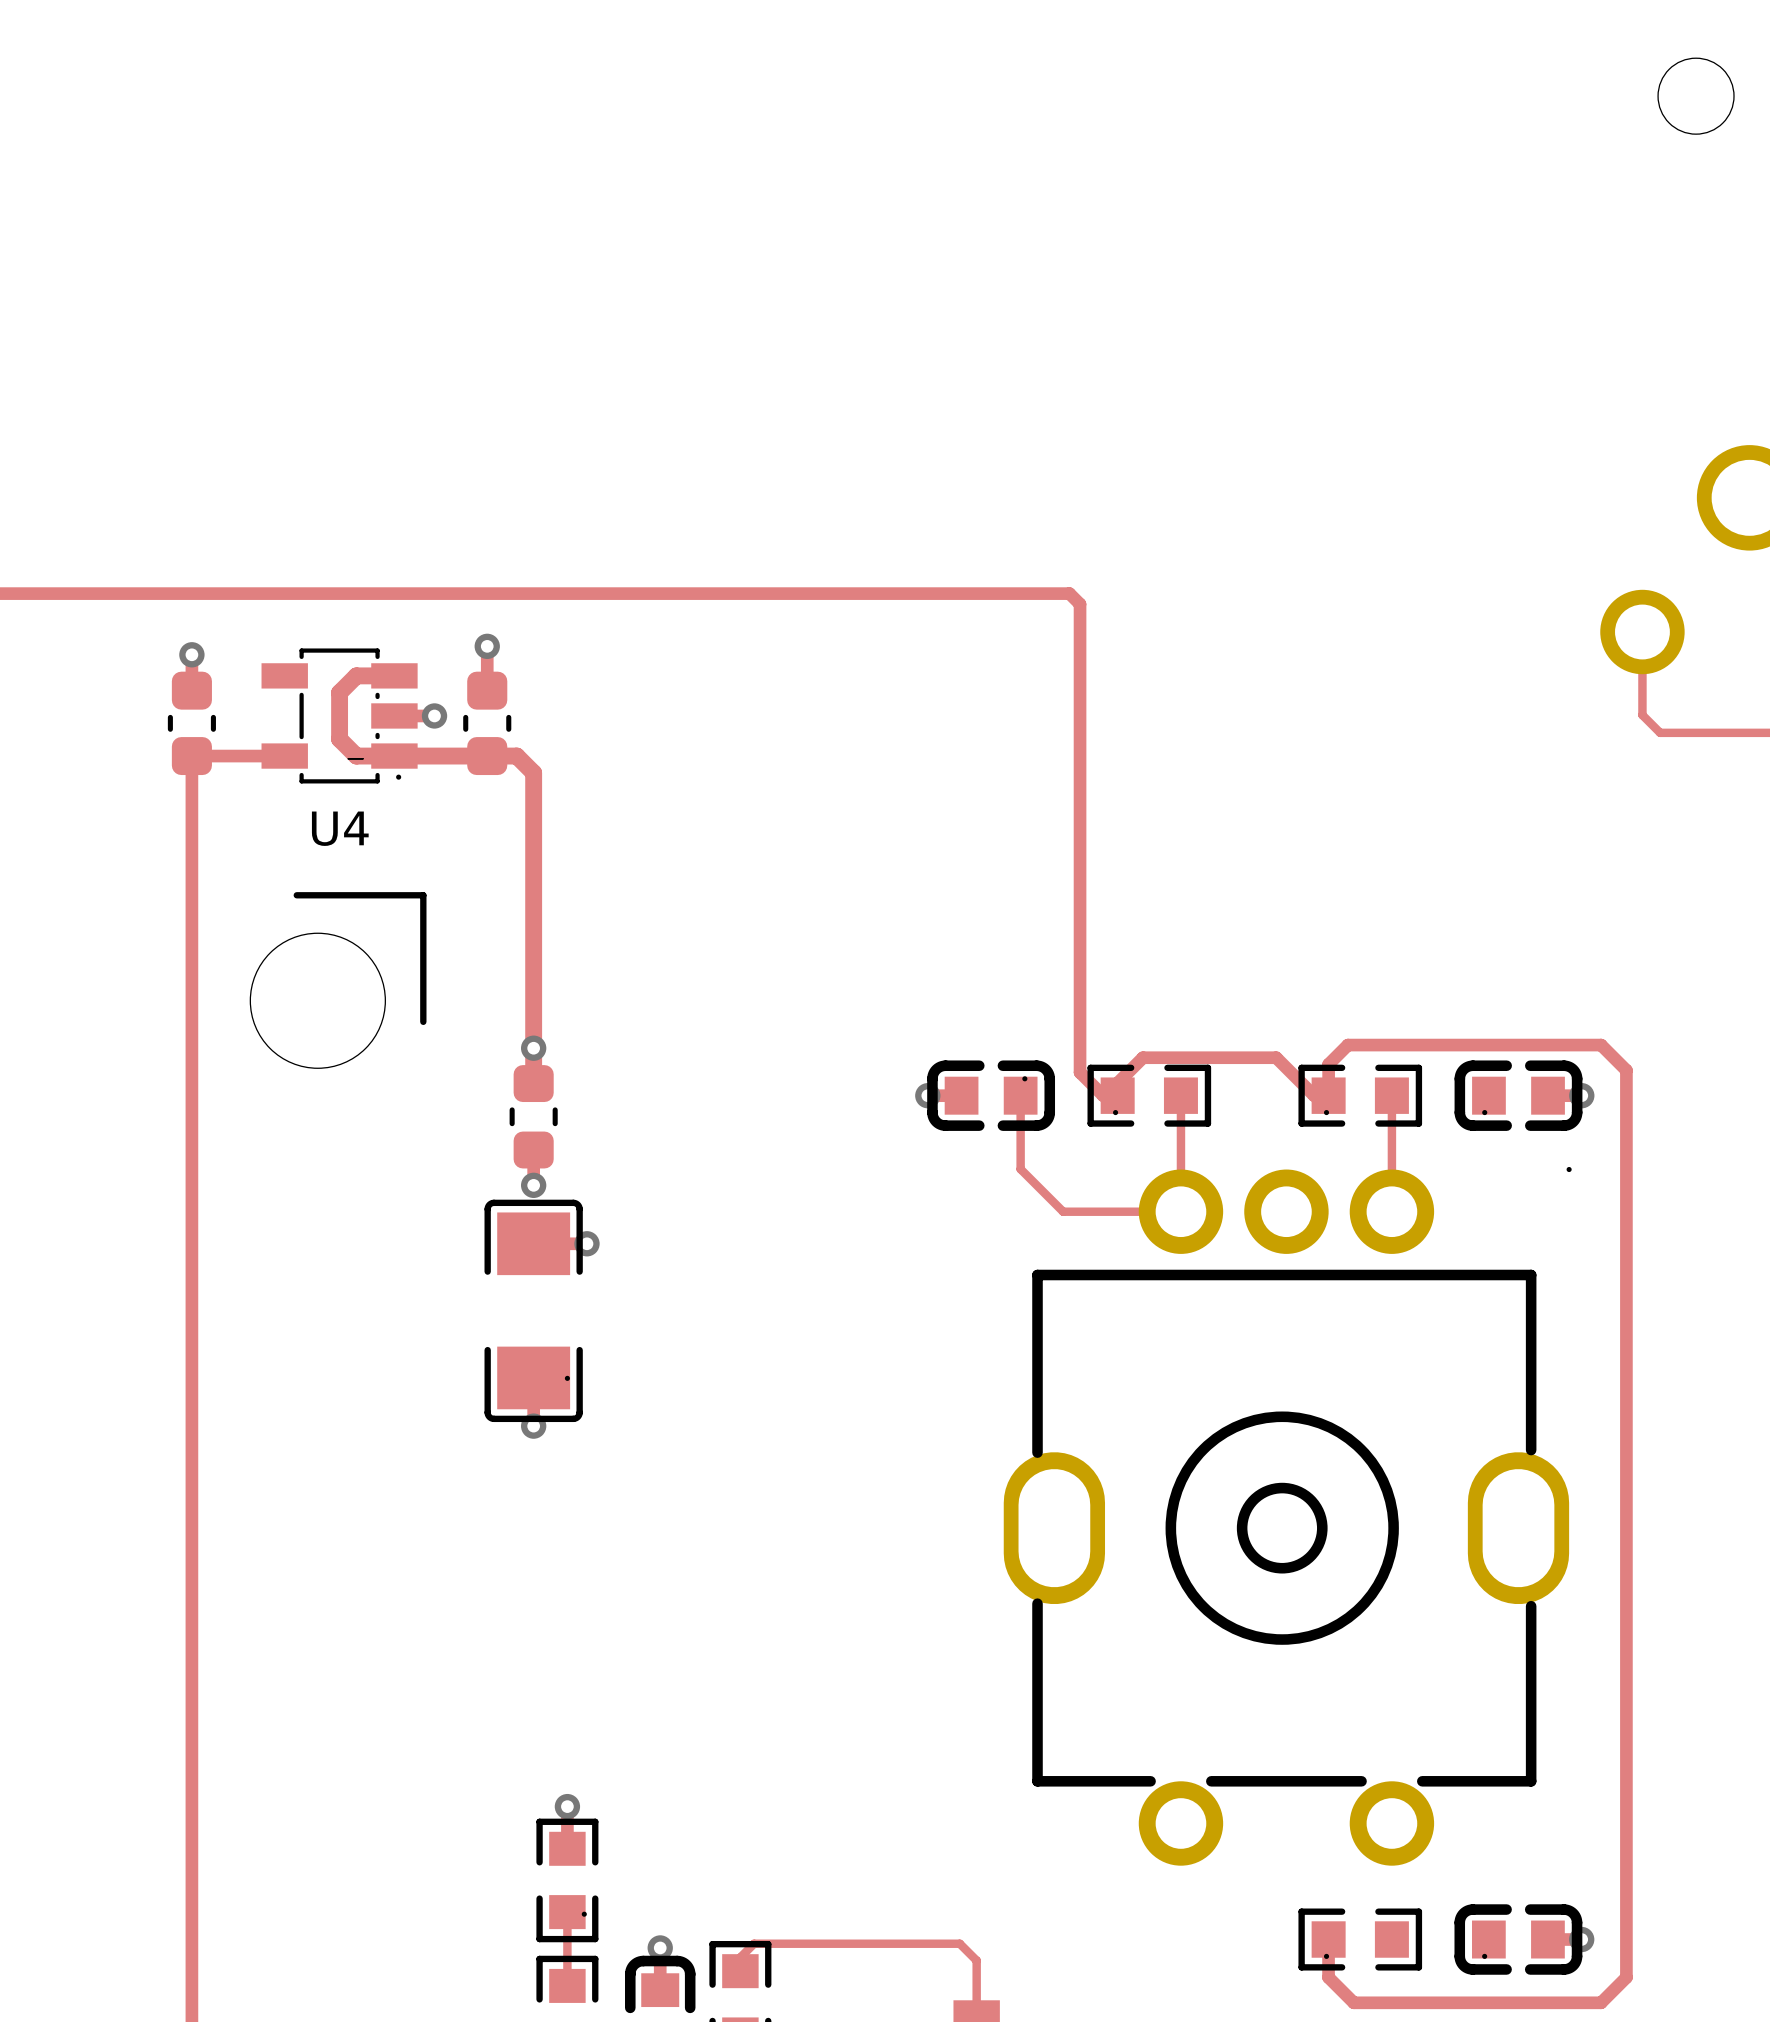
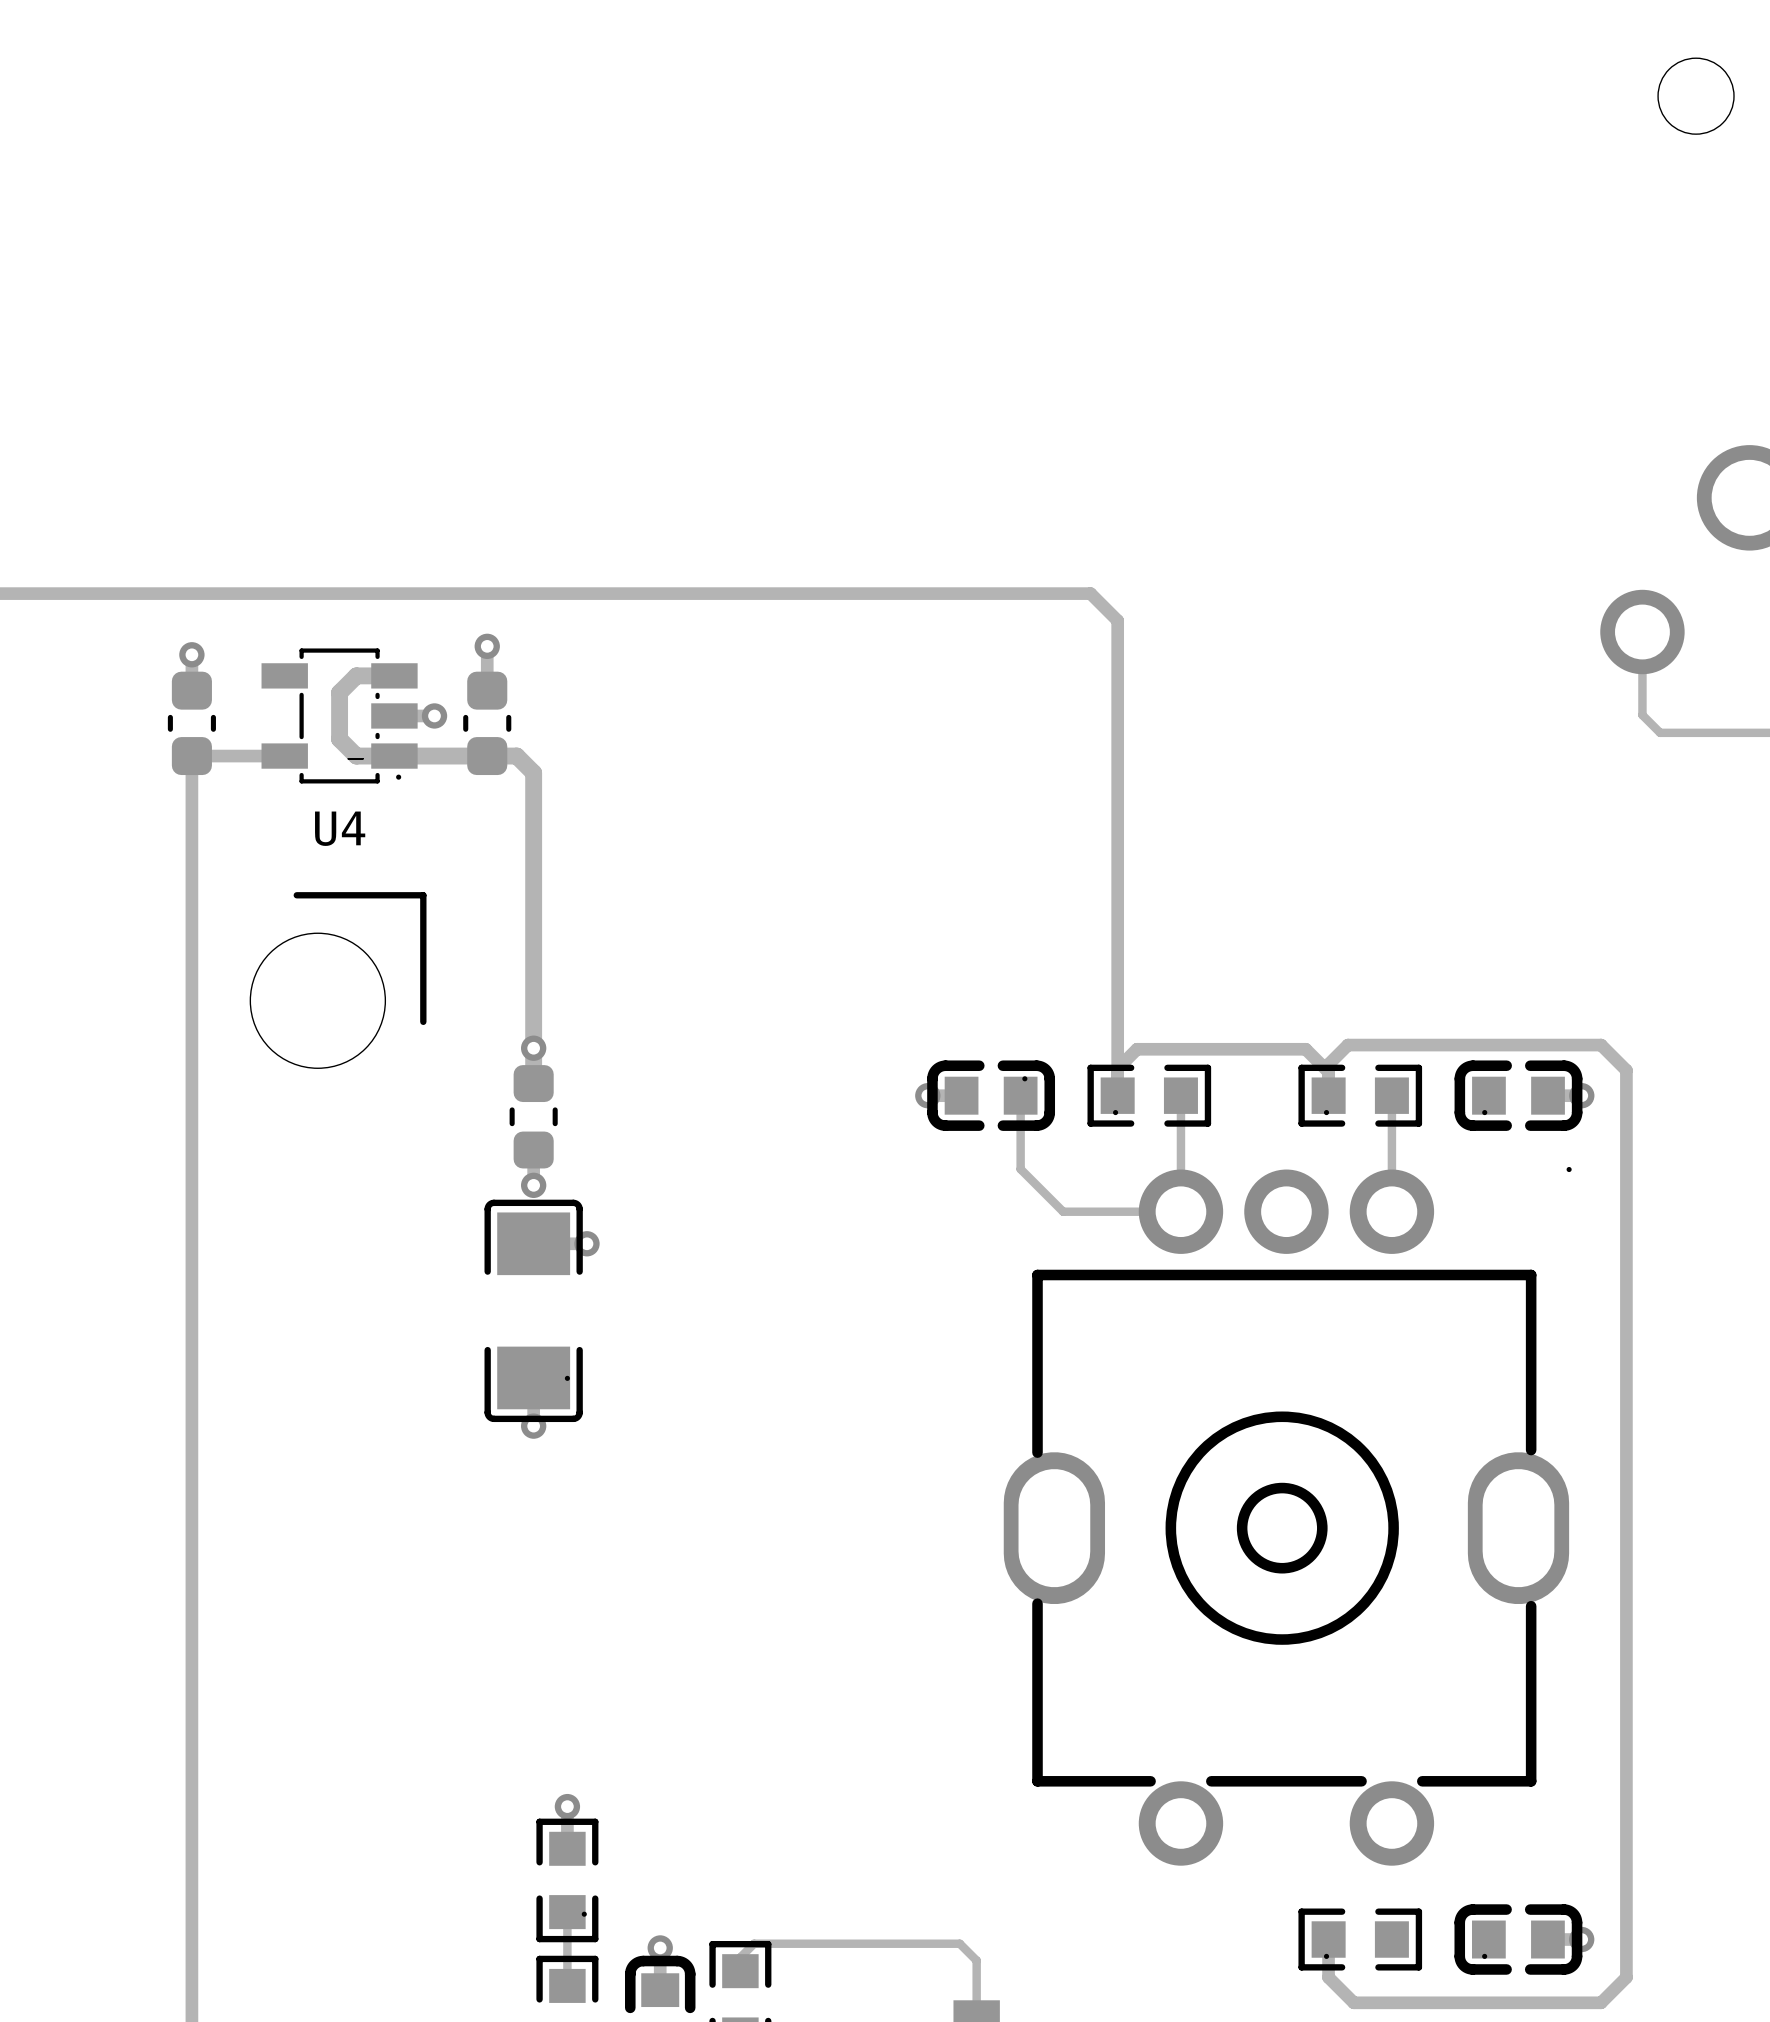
track: (1069, 593) (1080, 604) (1080, 1072) (1103, 1095) (1117, 1095) -> (1069, 593) (1090, 593) (1117, 620) (1117, 1083)
track: none -> (1117, 1068) (1136, 1049) (1305, 1049) (1328, 1072)
track: (1117, 1083) (1142, 1057) (1276, 1057) (1314, 1095) (1328, 1095) -> none

